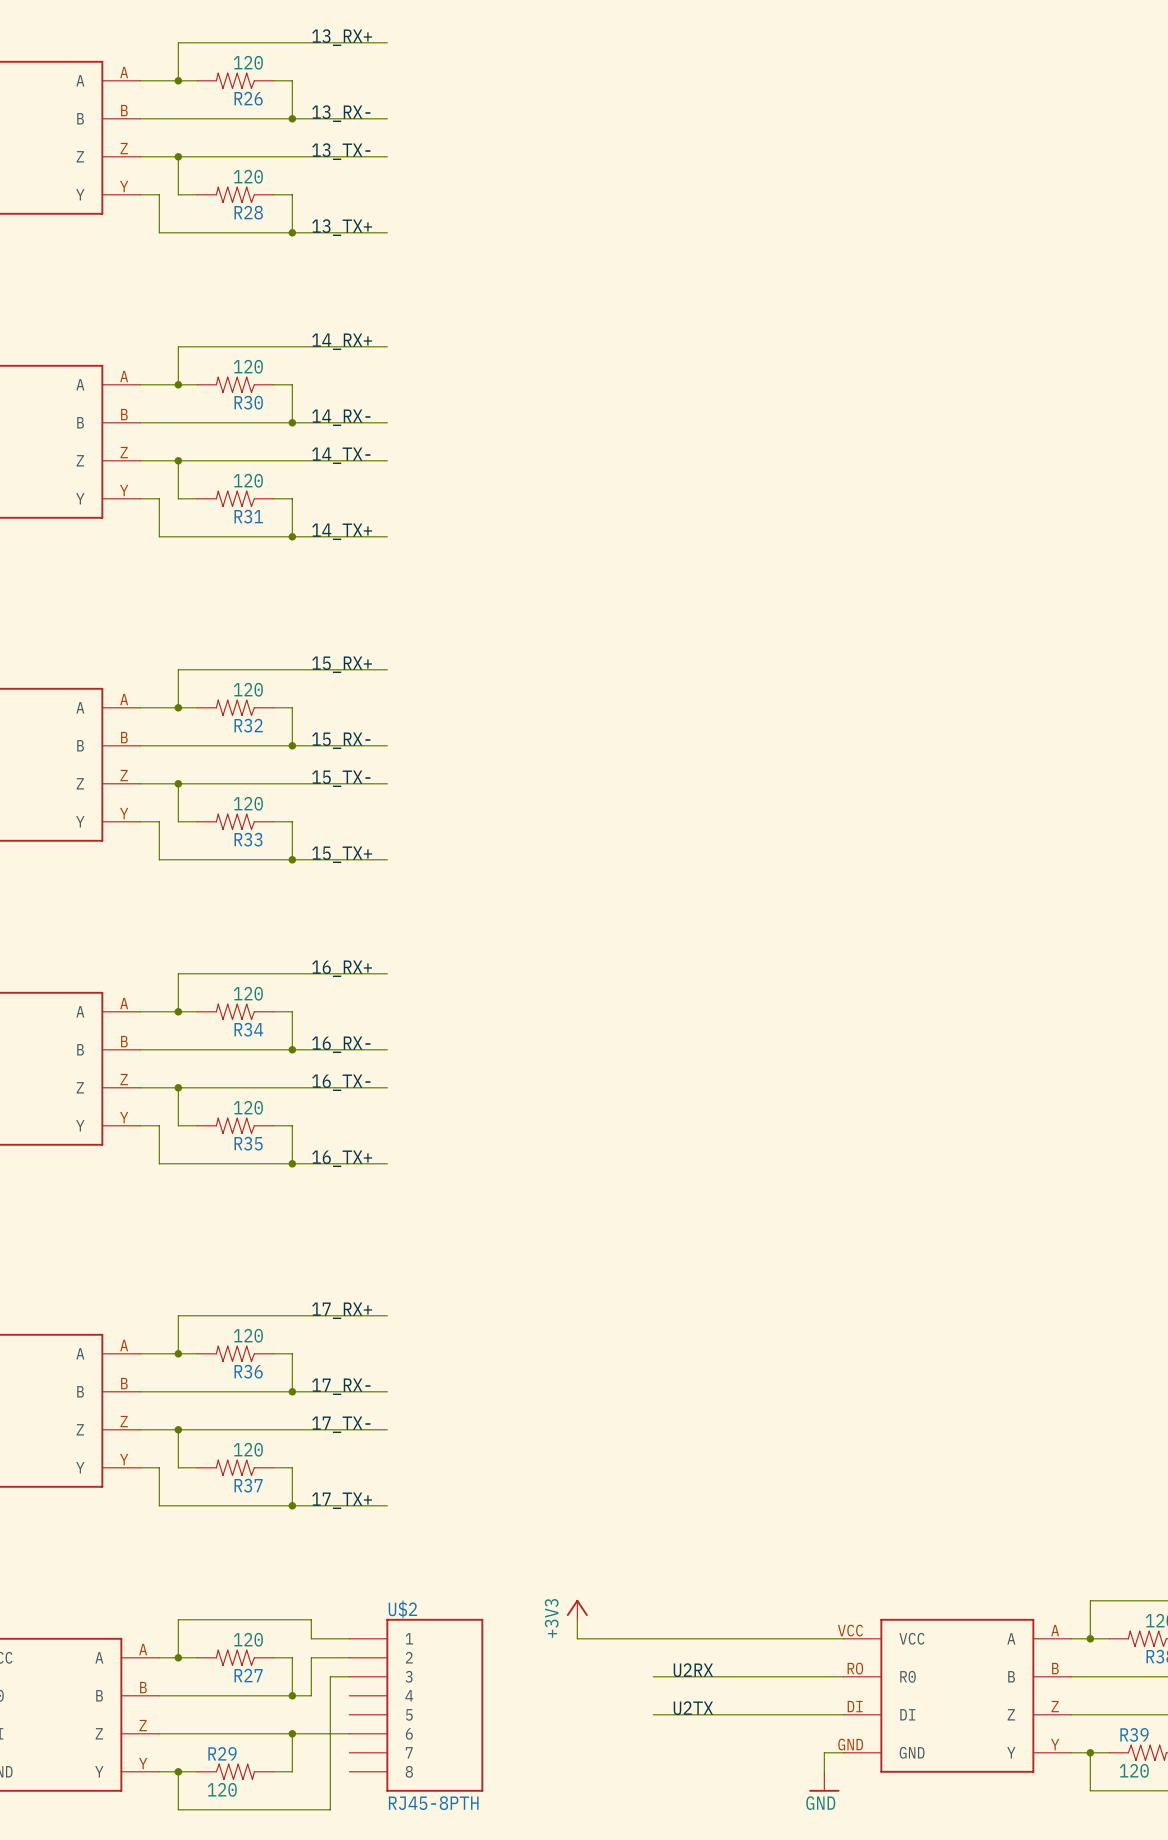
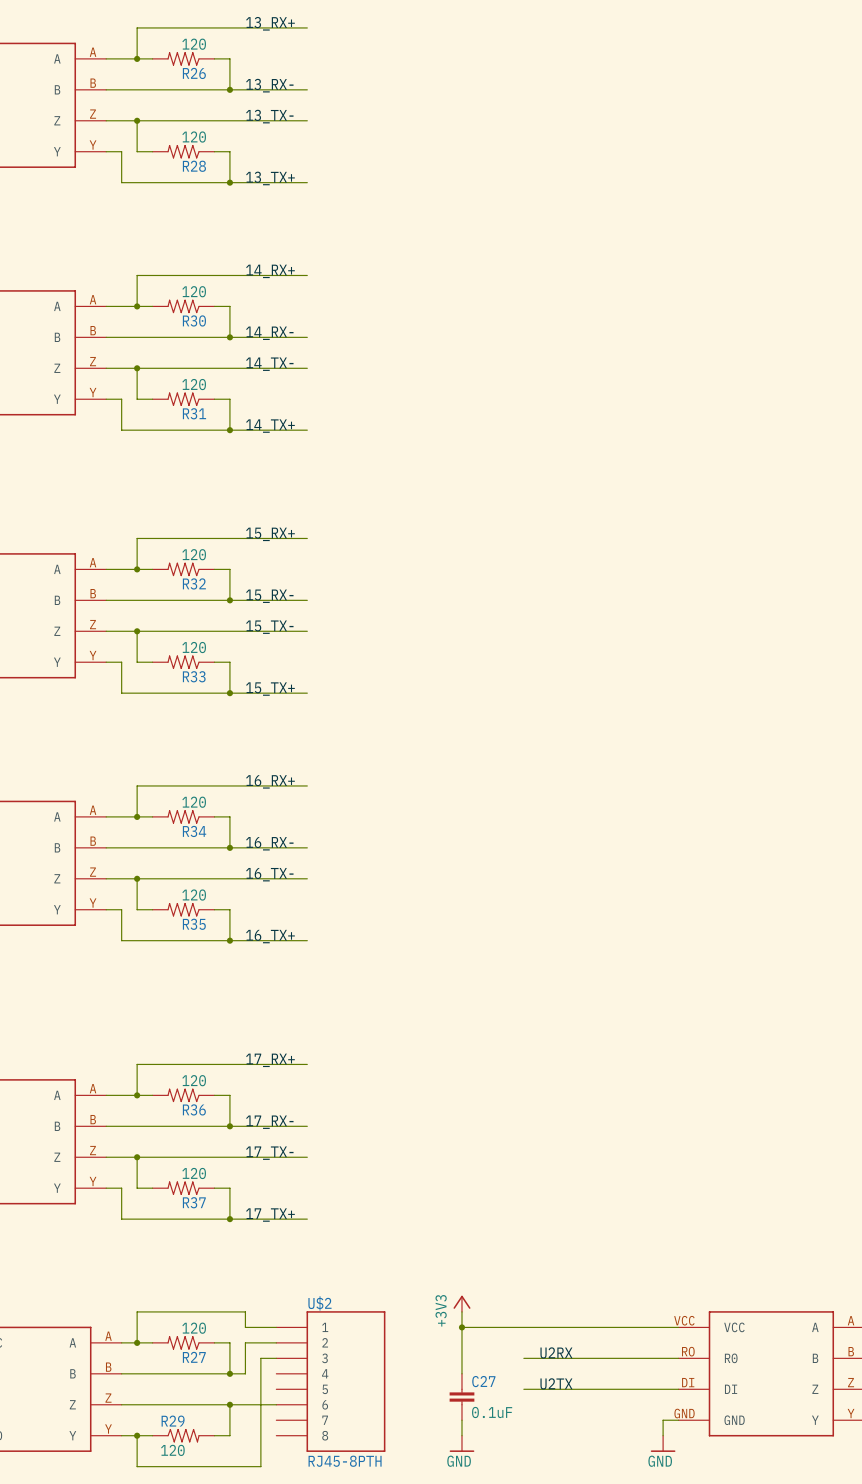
wire: none -> (461, 1327) (461, 1373)
junction: none -> (461, 1327)
C27: none -> 0.1uF (461, 1397)
wire: none -> (461, 1420) (461, 1435)
power symbol: none -> GND (461, 1443)

